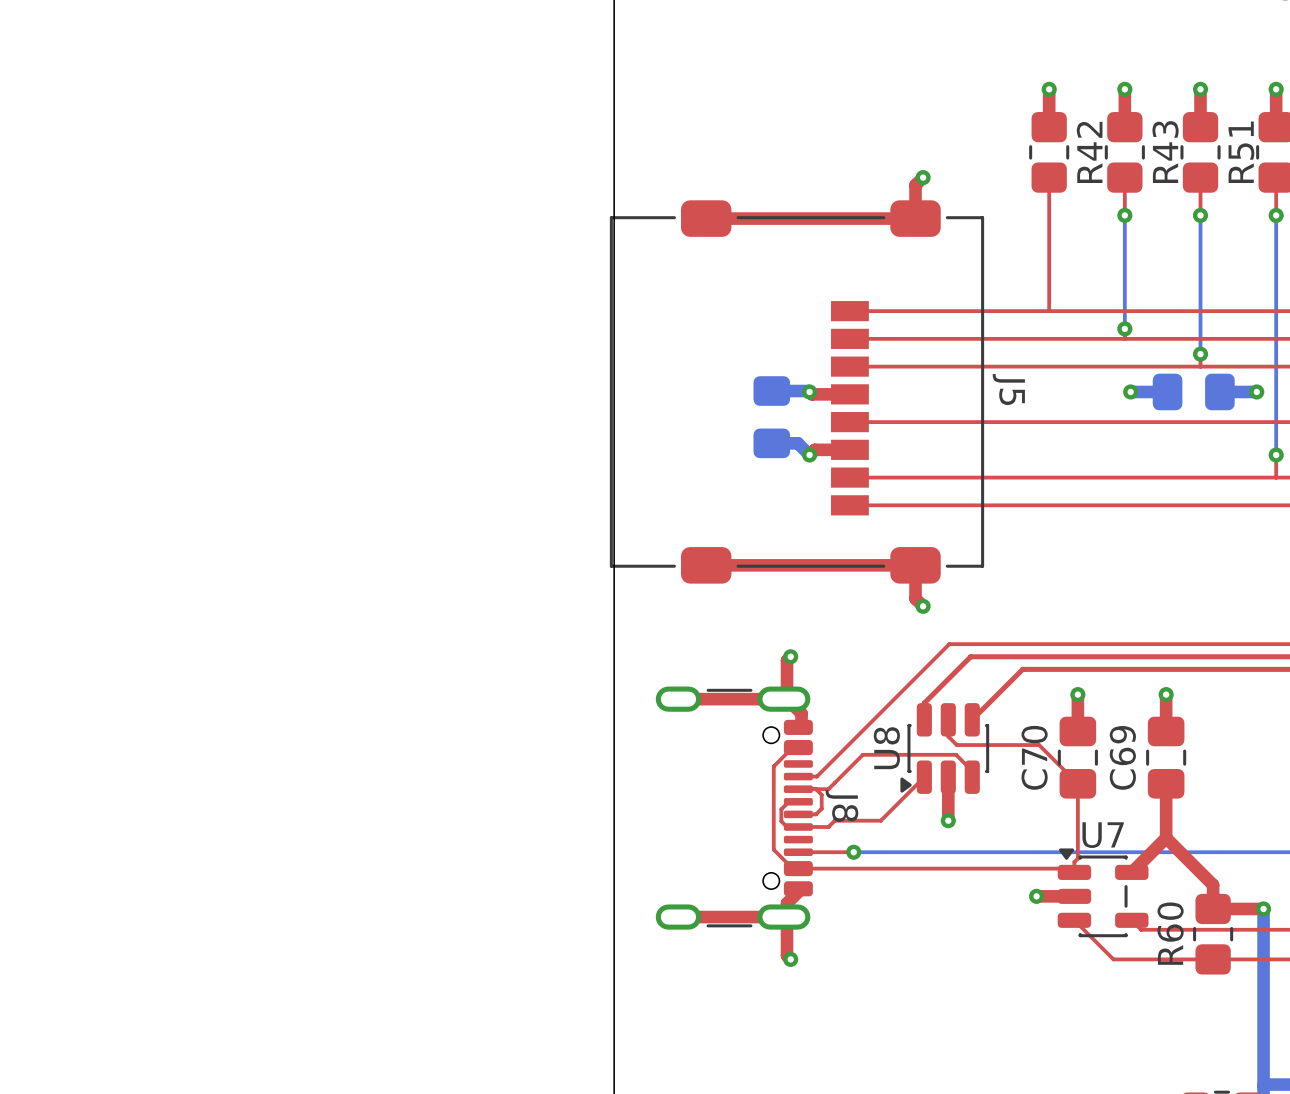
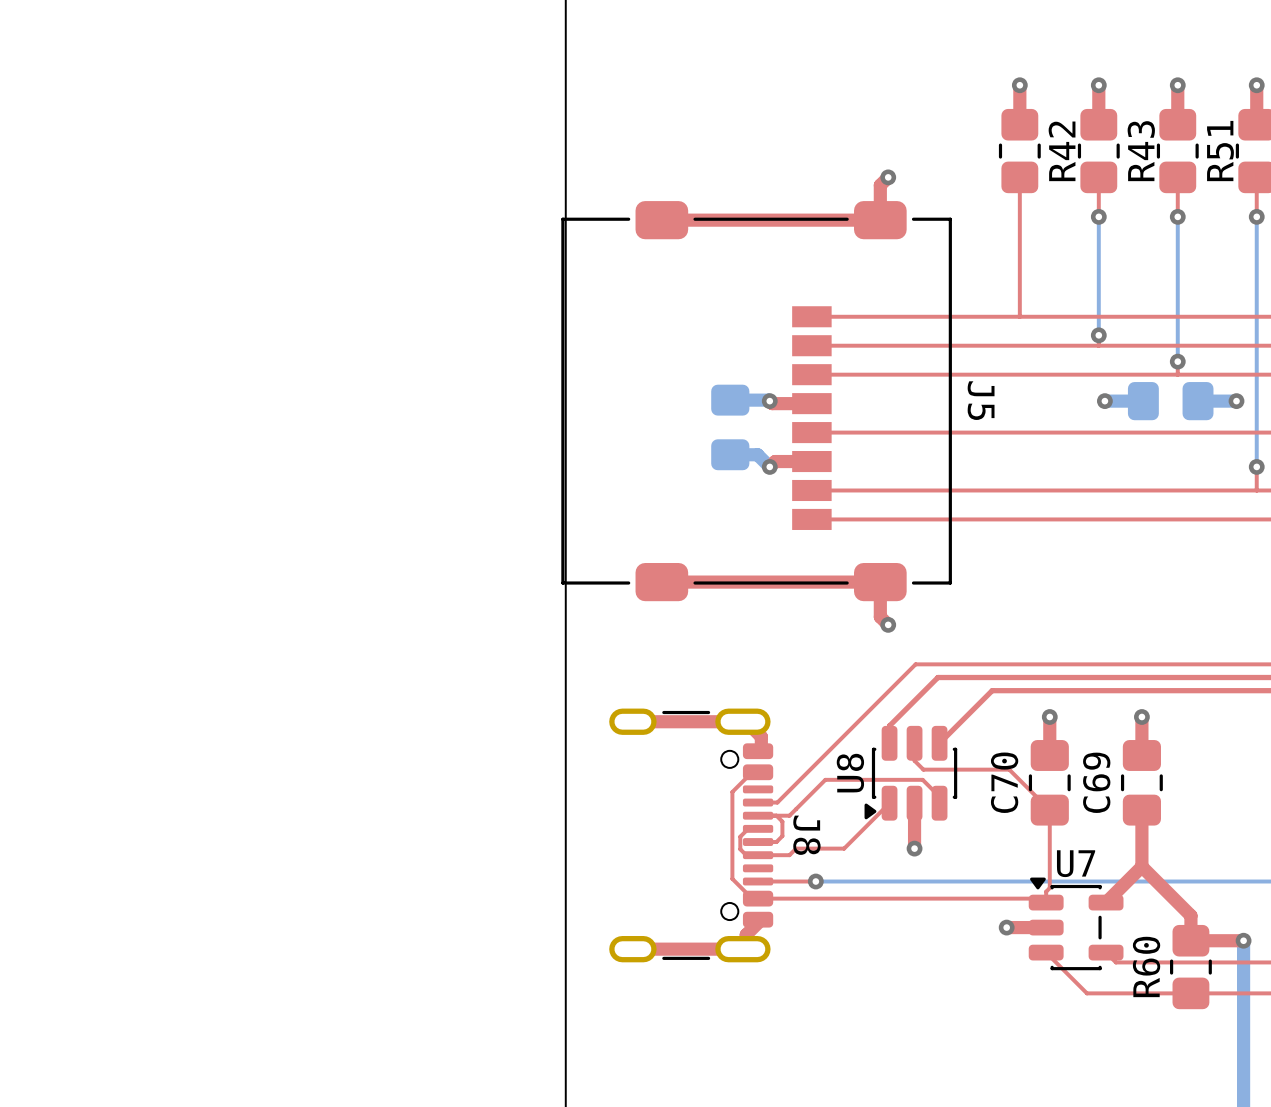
top track: (790, 656) (787, 660) (787, 699) -> none
via: (790, 656) -> none
top track: (787, 917) (787, 955) (790, 959) -> none
via: (790, 959) -> none

